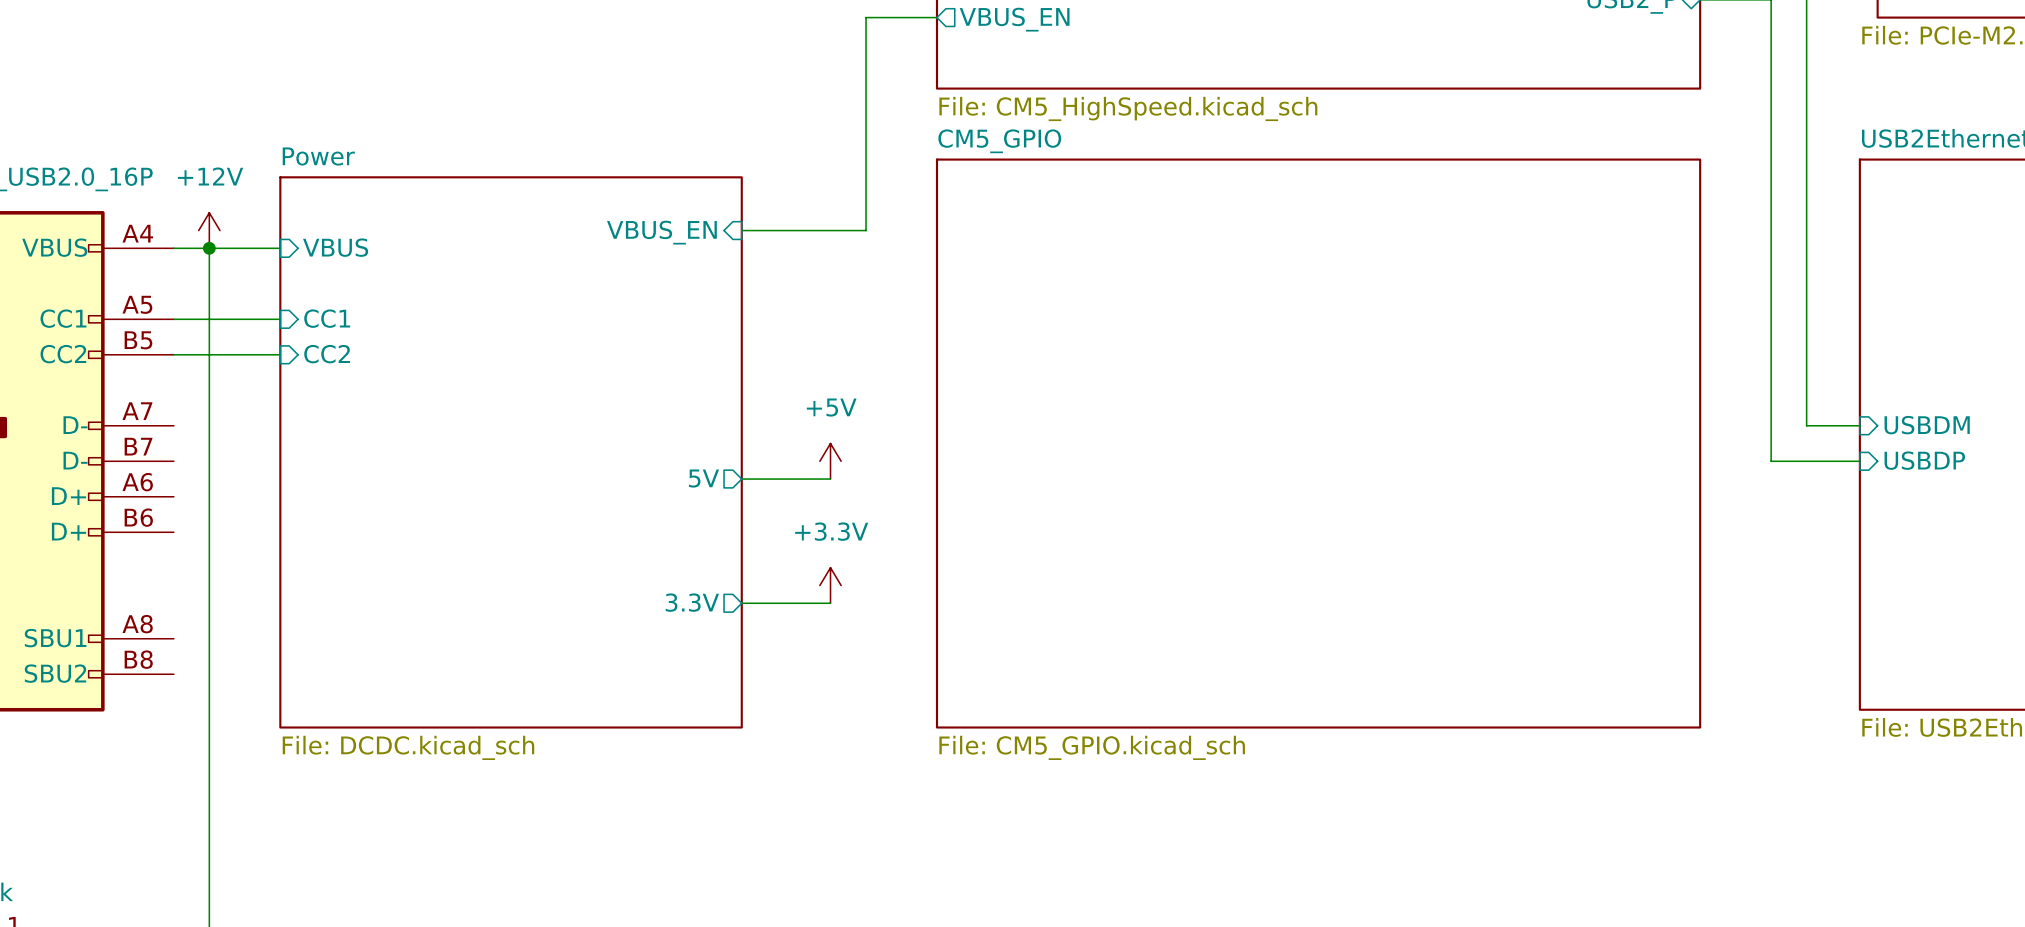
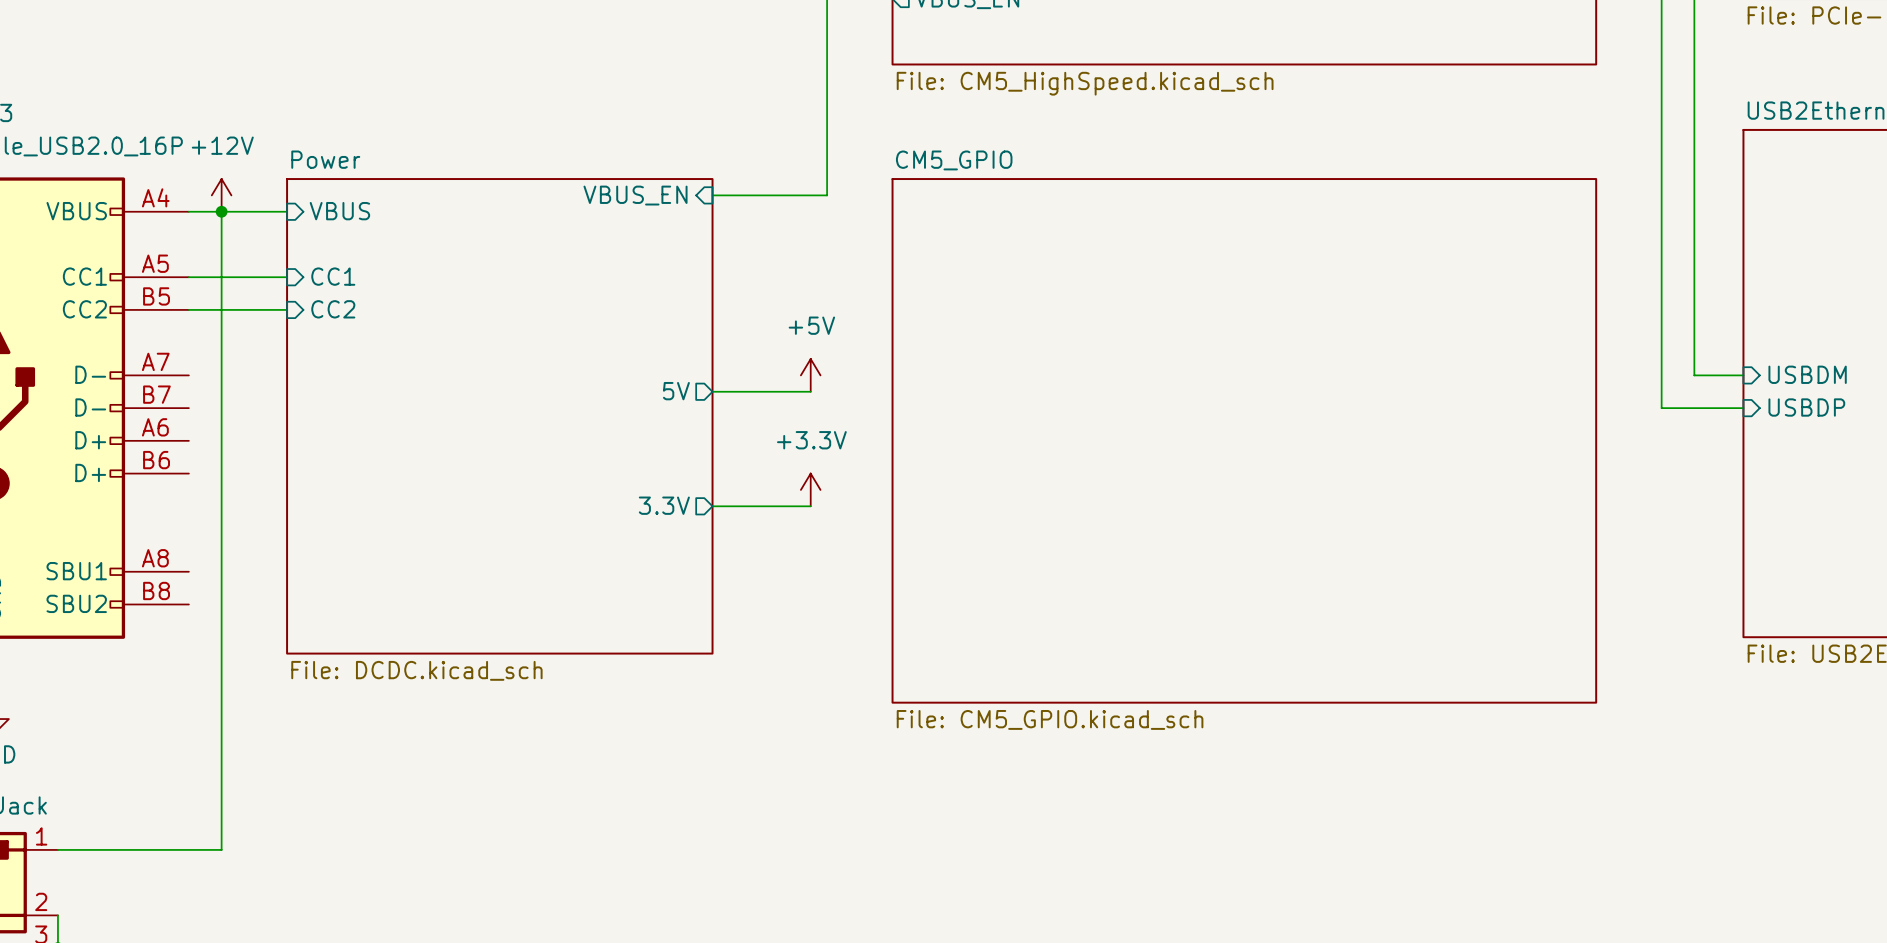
wire: none -> (712, 391) (810, 391)
sheet CM5_GPIO position: (1318, 443) -> (1244, 440)
sheet Power: File: DCDC.kicad_sch (511, 452) -> none
power symbol position: +5V (830, 461) -> +5V (810, 375)
sheet Power: none -> File: DCDC.kicad_sch (499, 416)
sheet pin position: 5V (704, 478) -> 5V (676, 391)
wire: (741, 479) (830, 479) -> none
wire: none -> (712, 506) (810, 506)
power symbol position: +3.3V (830, 585) -> +3.3V (810, 489)
sheet pin position: 3.3V (692, 602) -> 3.3V (664, 505)
wire: (741, 603) (830, 603) -> none

